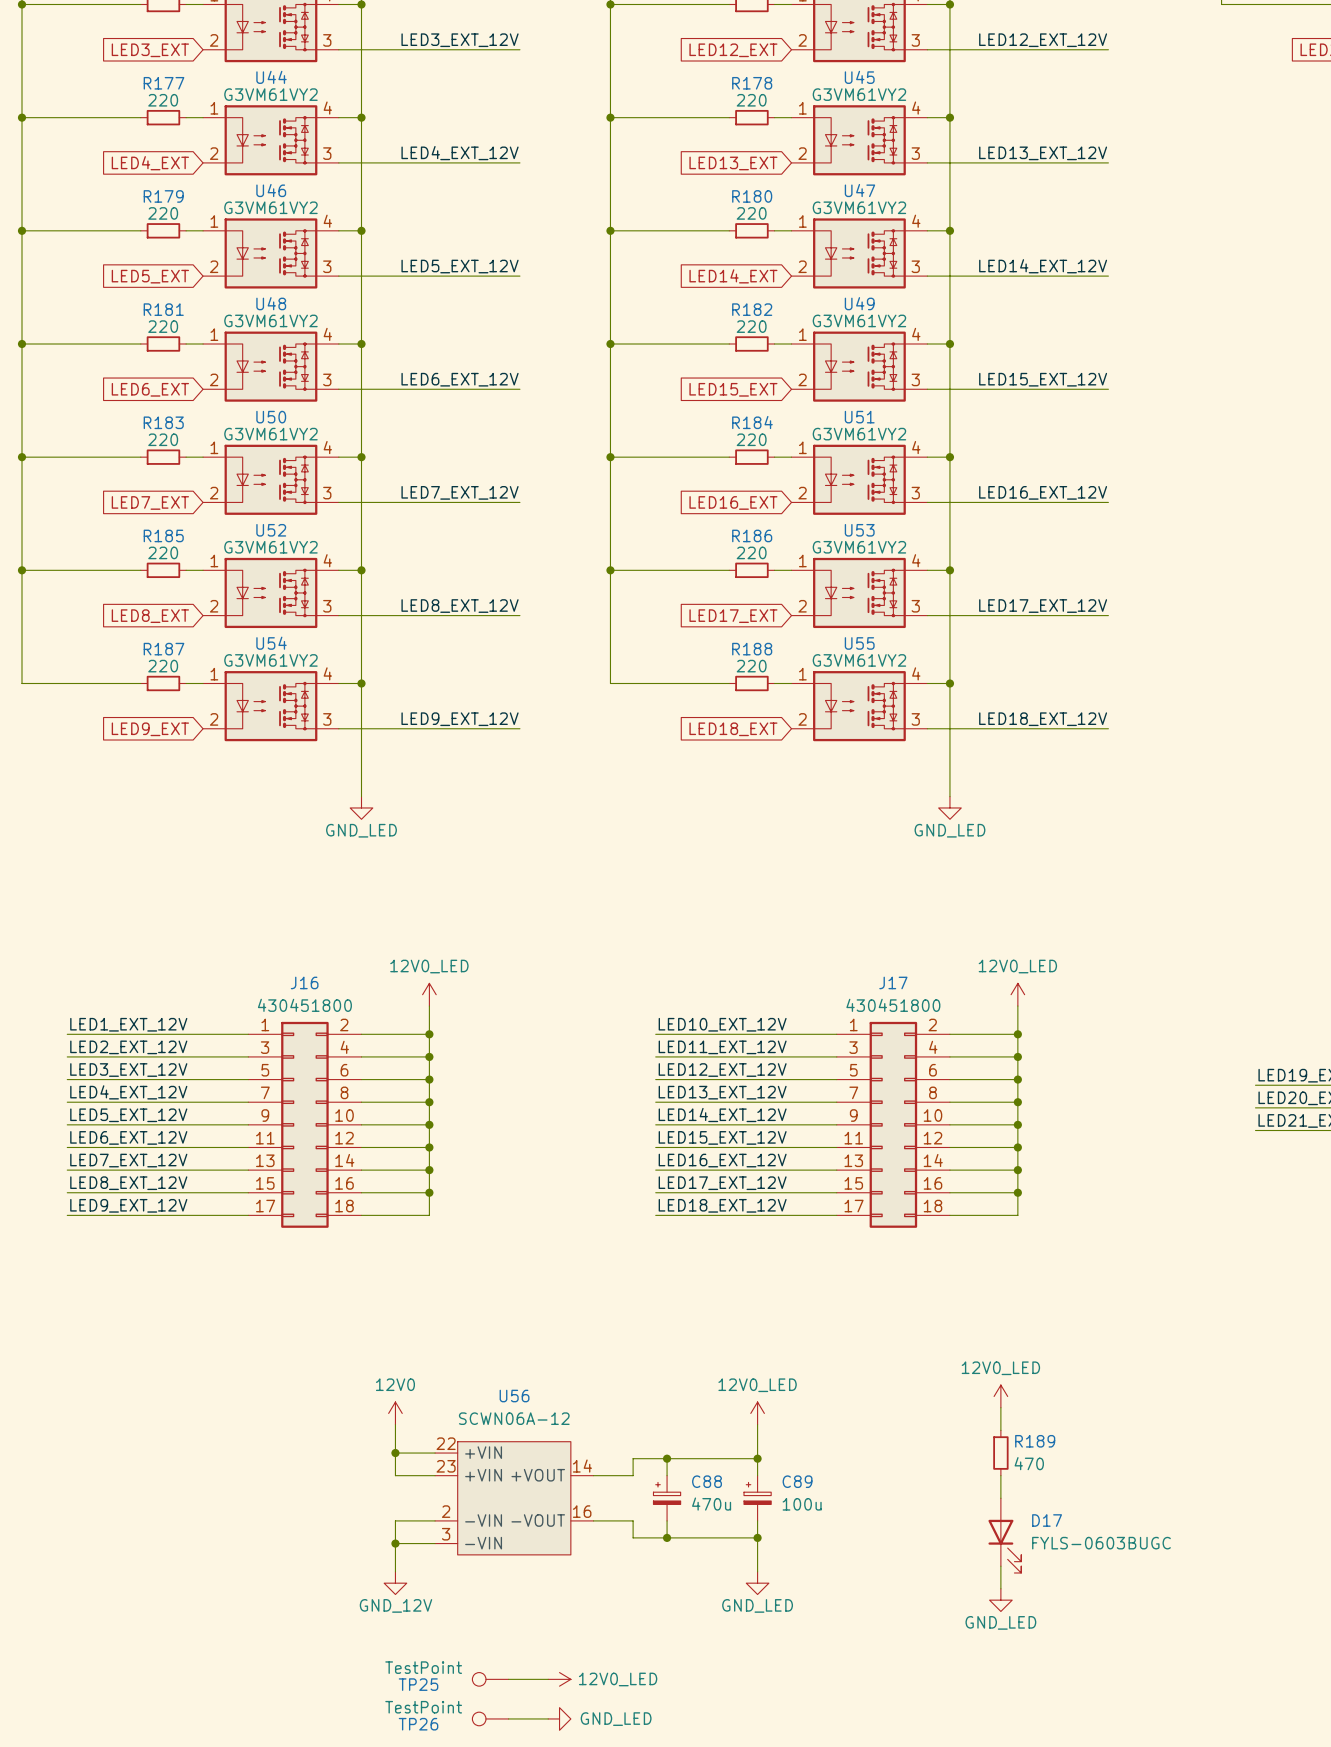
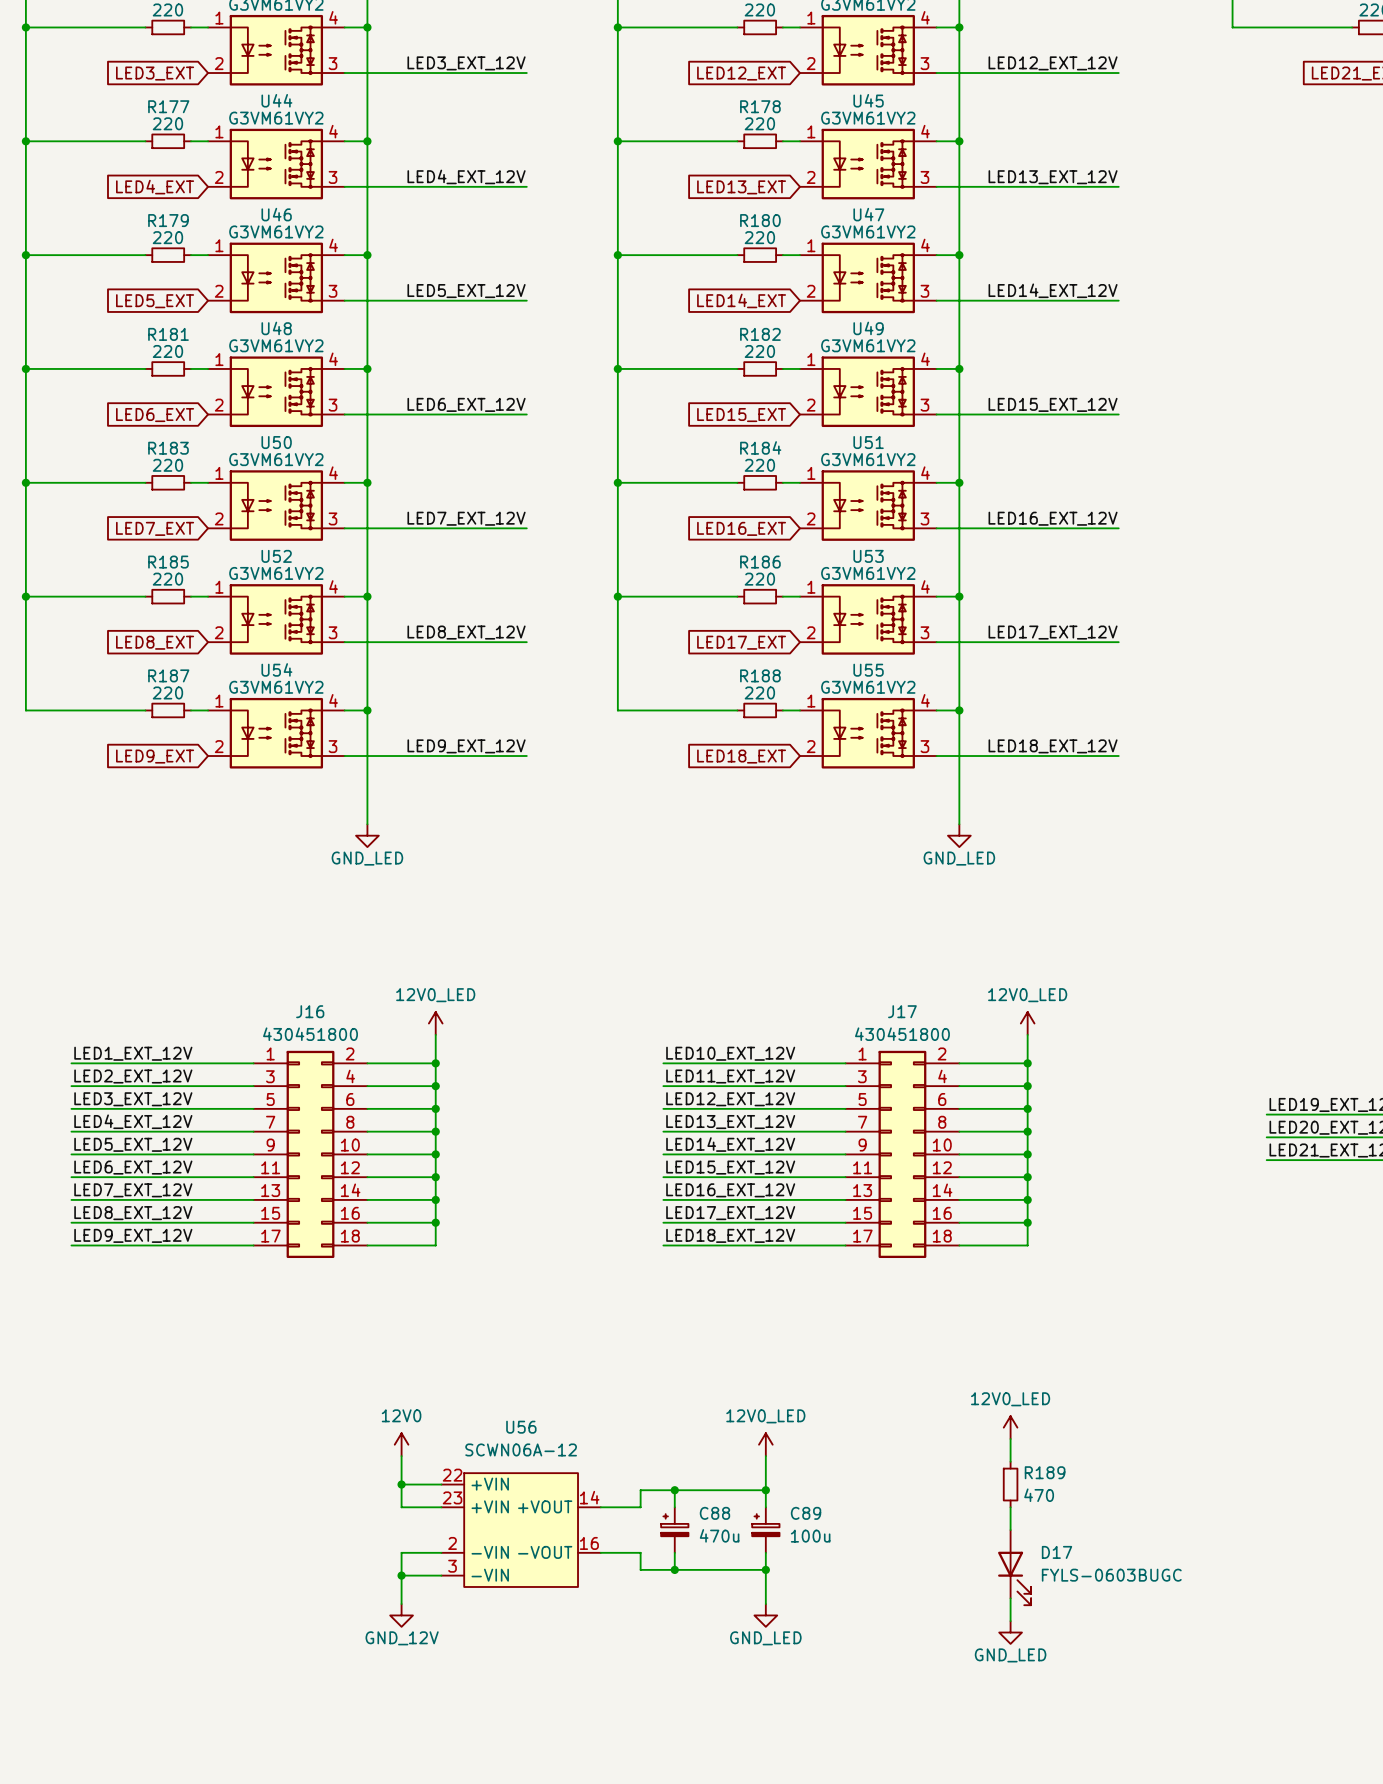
TP25: TestPoint (490, 1679) -> none
wire: (508, 1679) (548, 1679) -> none
power symbol: 12V0_LED (559, 1679) -> none
TP26: TestPoint (490, 1718) -> none
wire: (508, 1718) (548, 1718) -> none
power symbol: GND_LED (559, 1718) -> none

